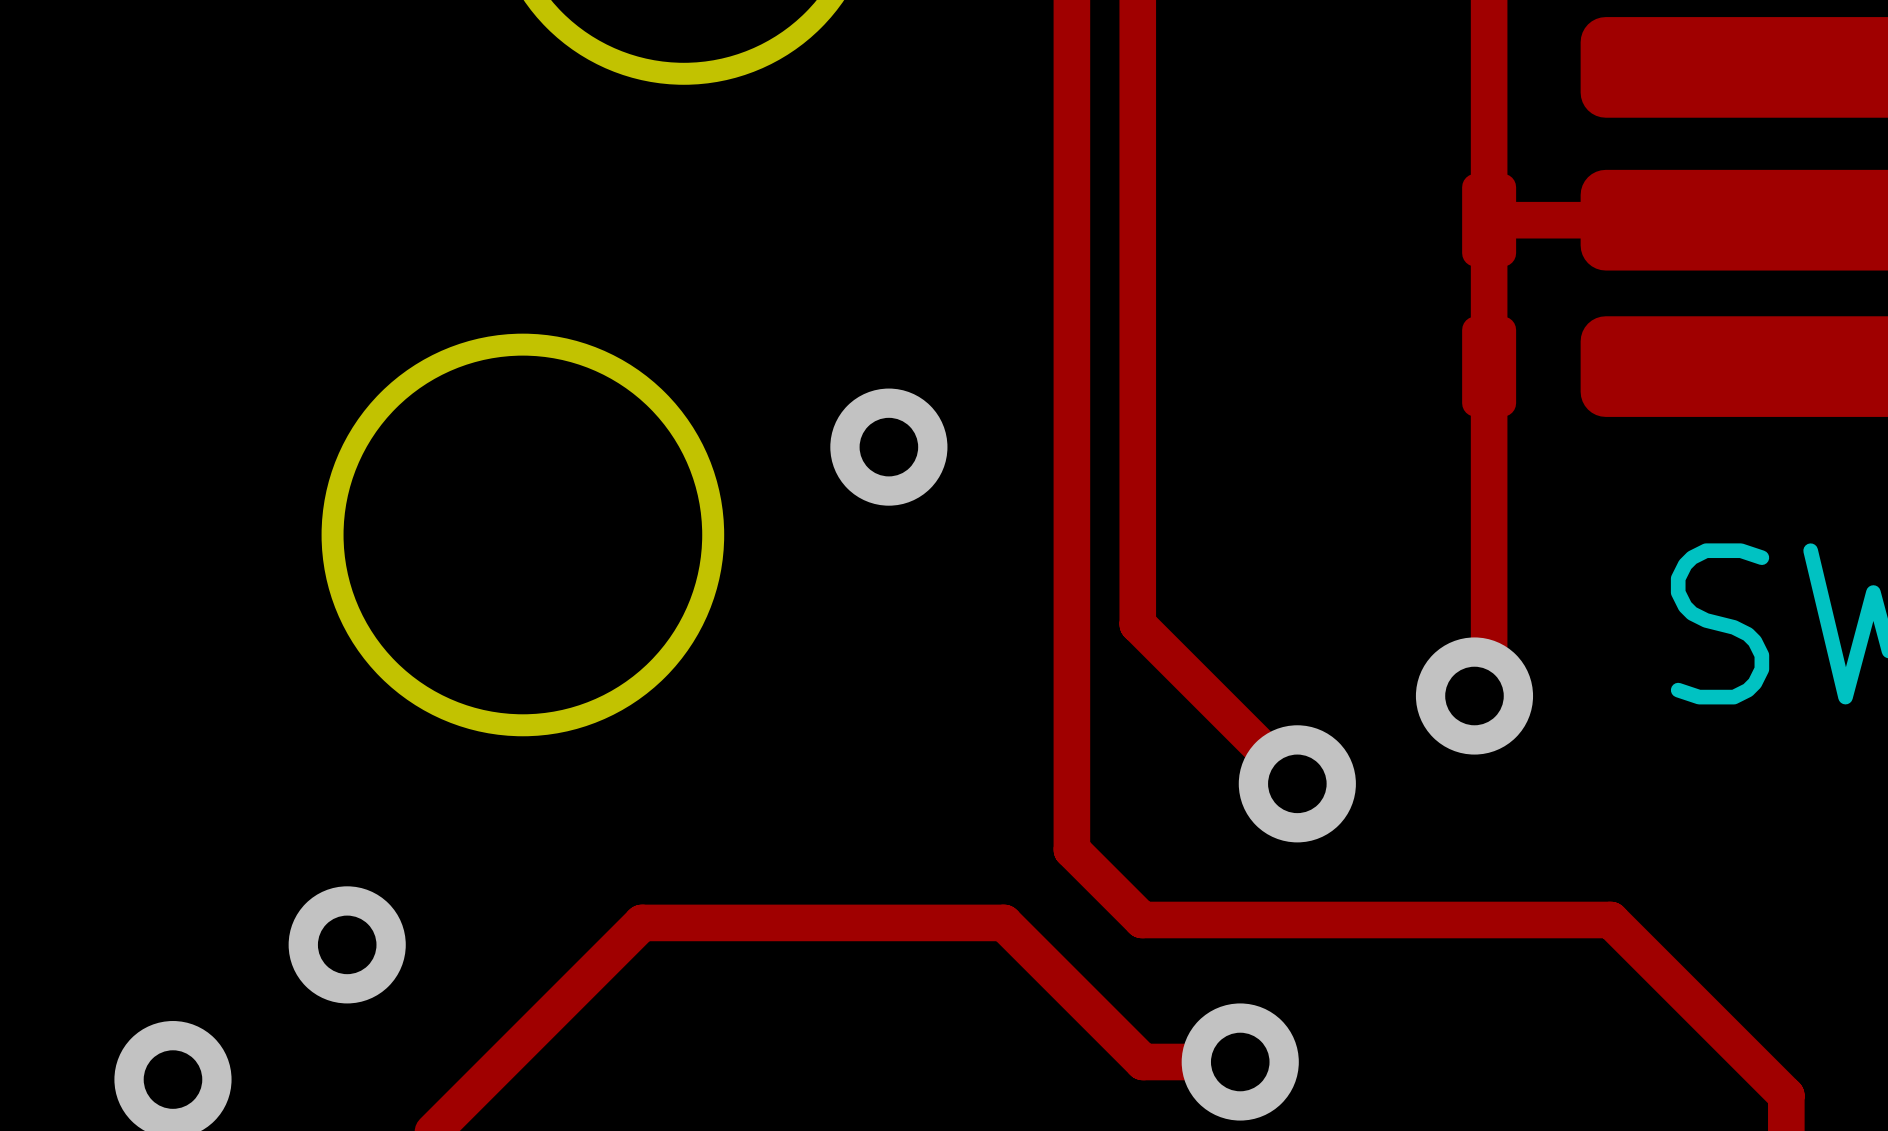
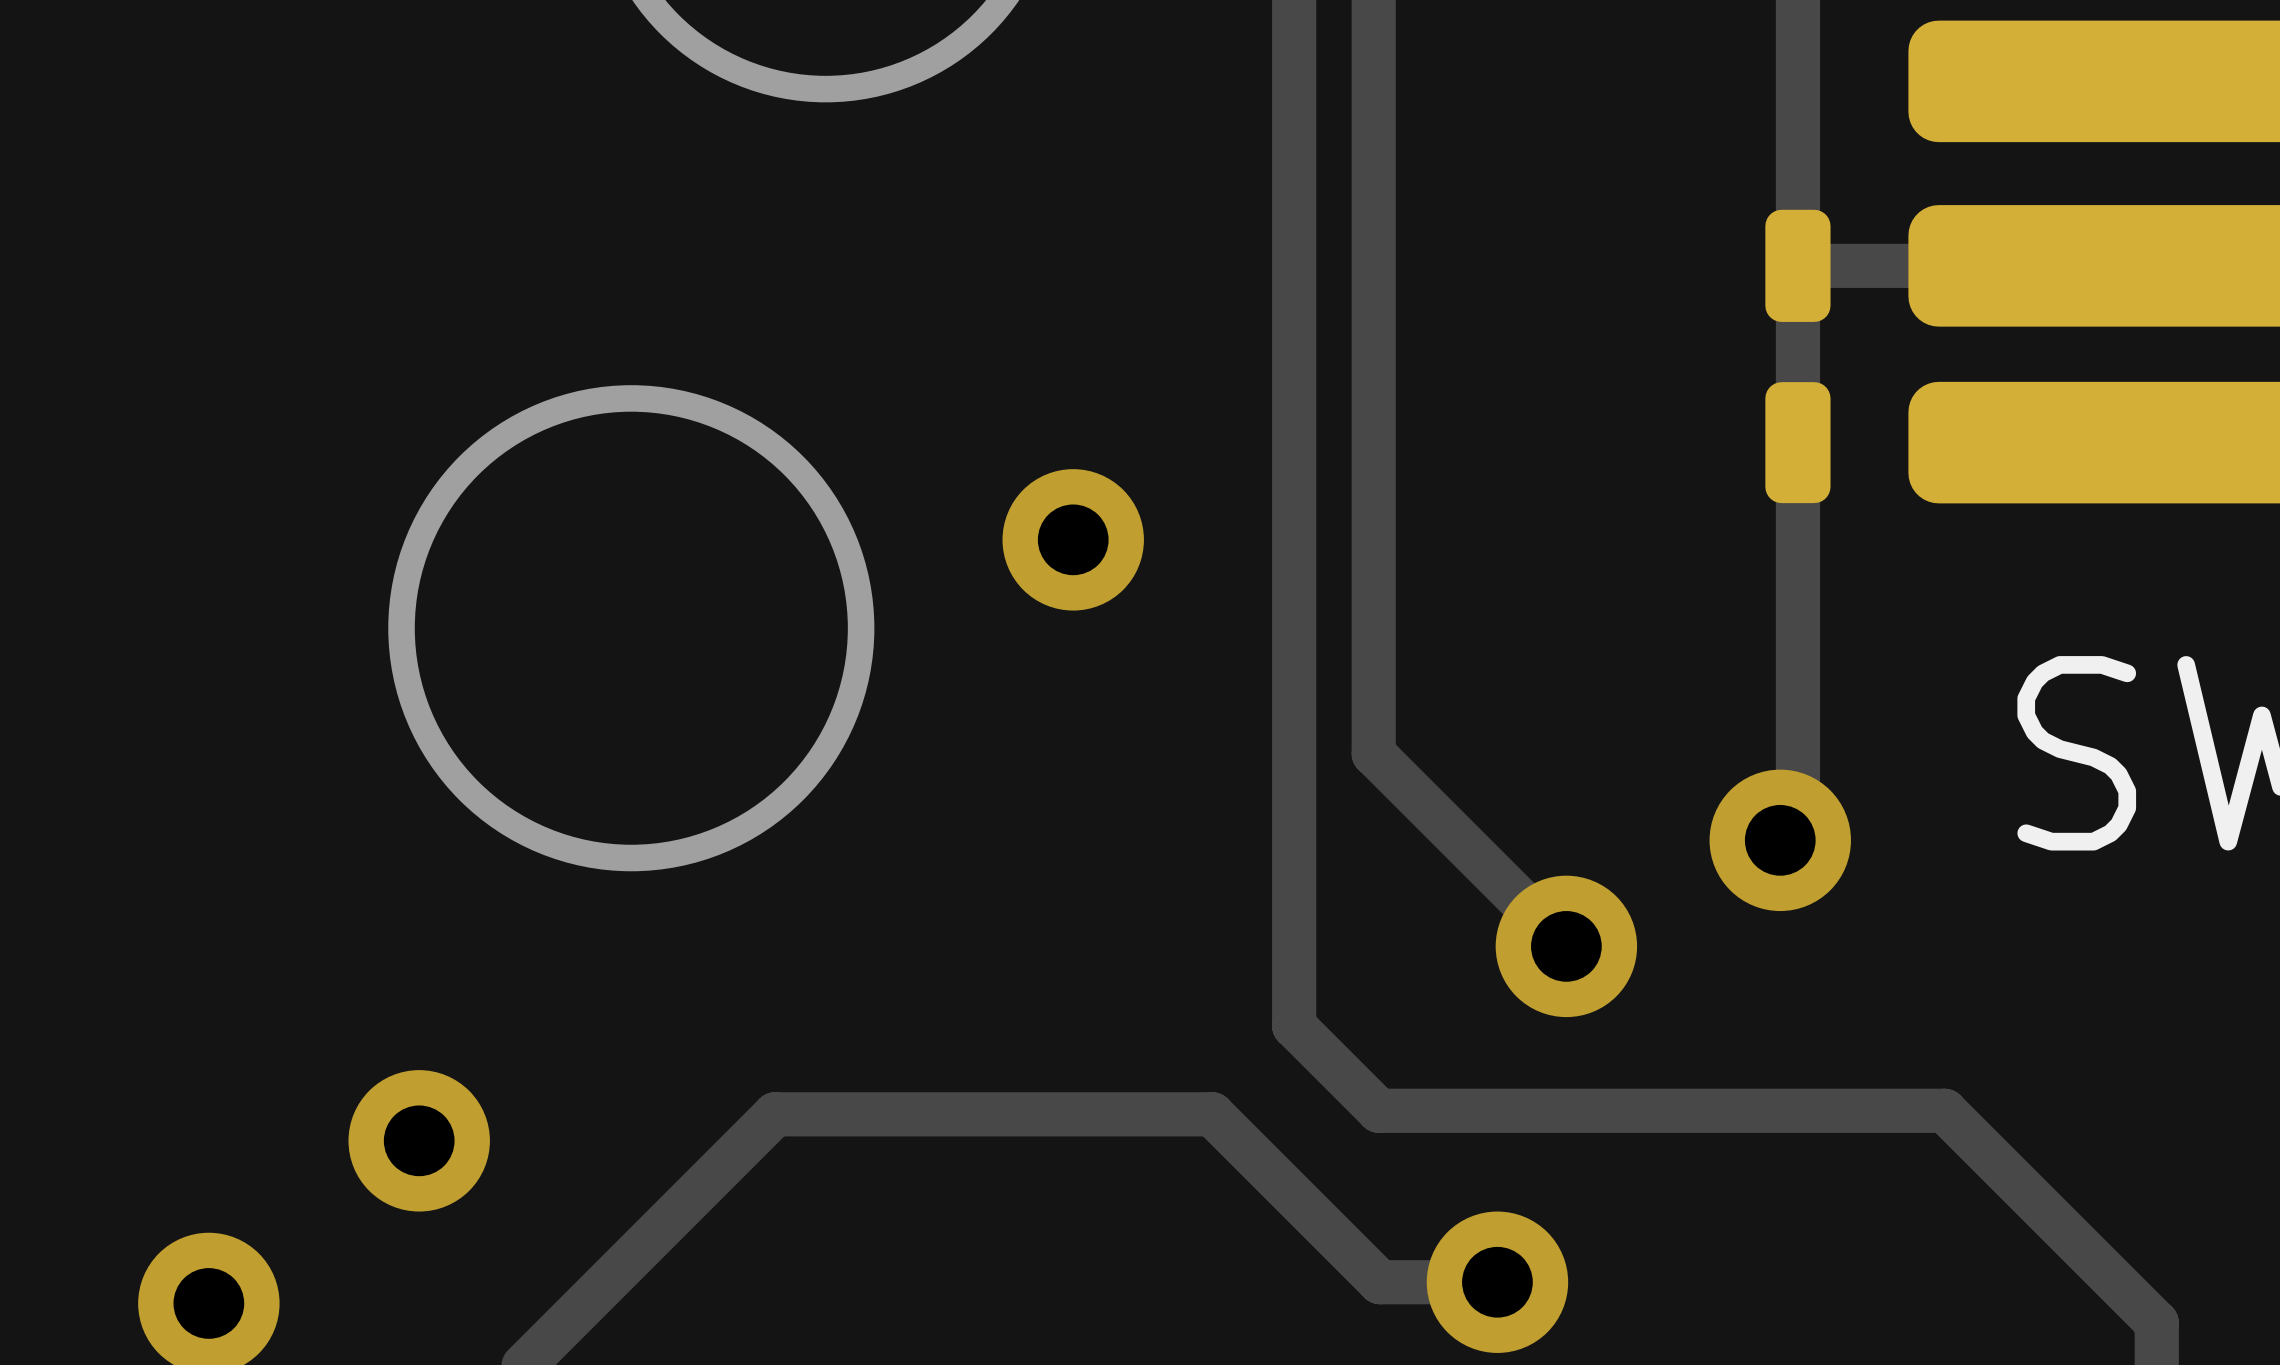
round board edge position: (522, 534) -> (631, 628)

